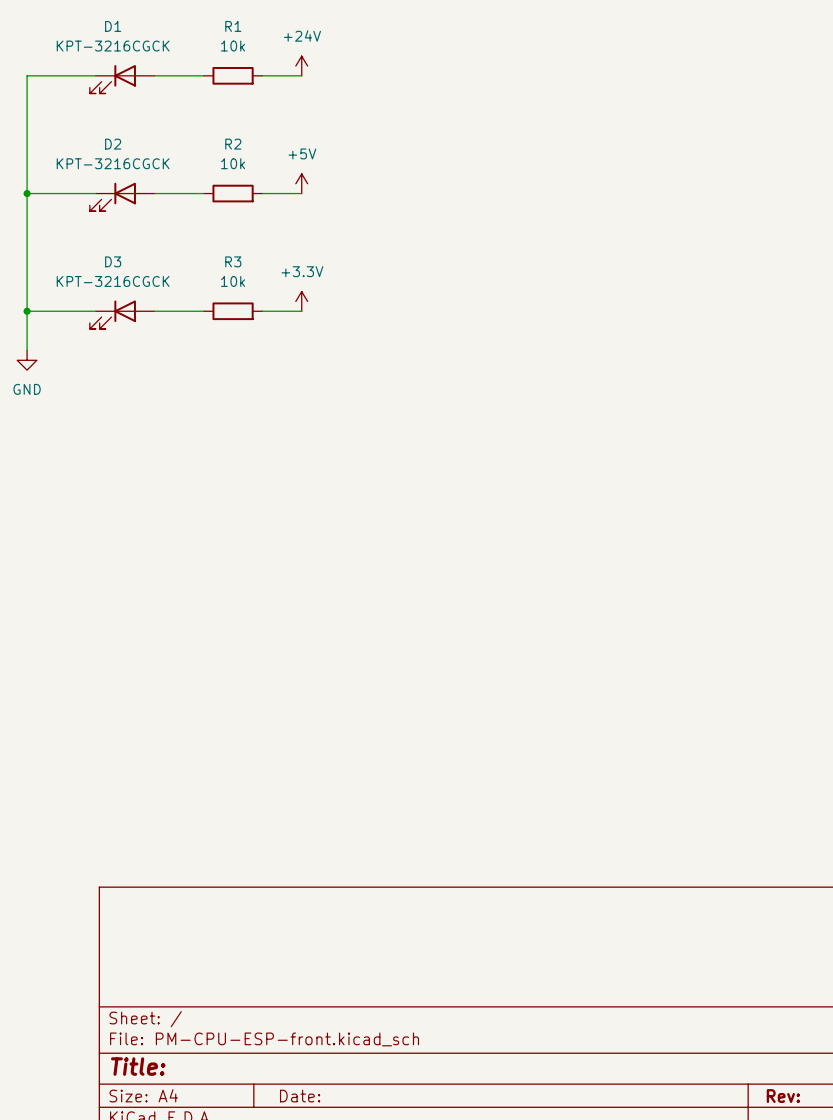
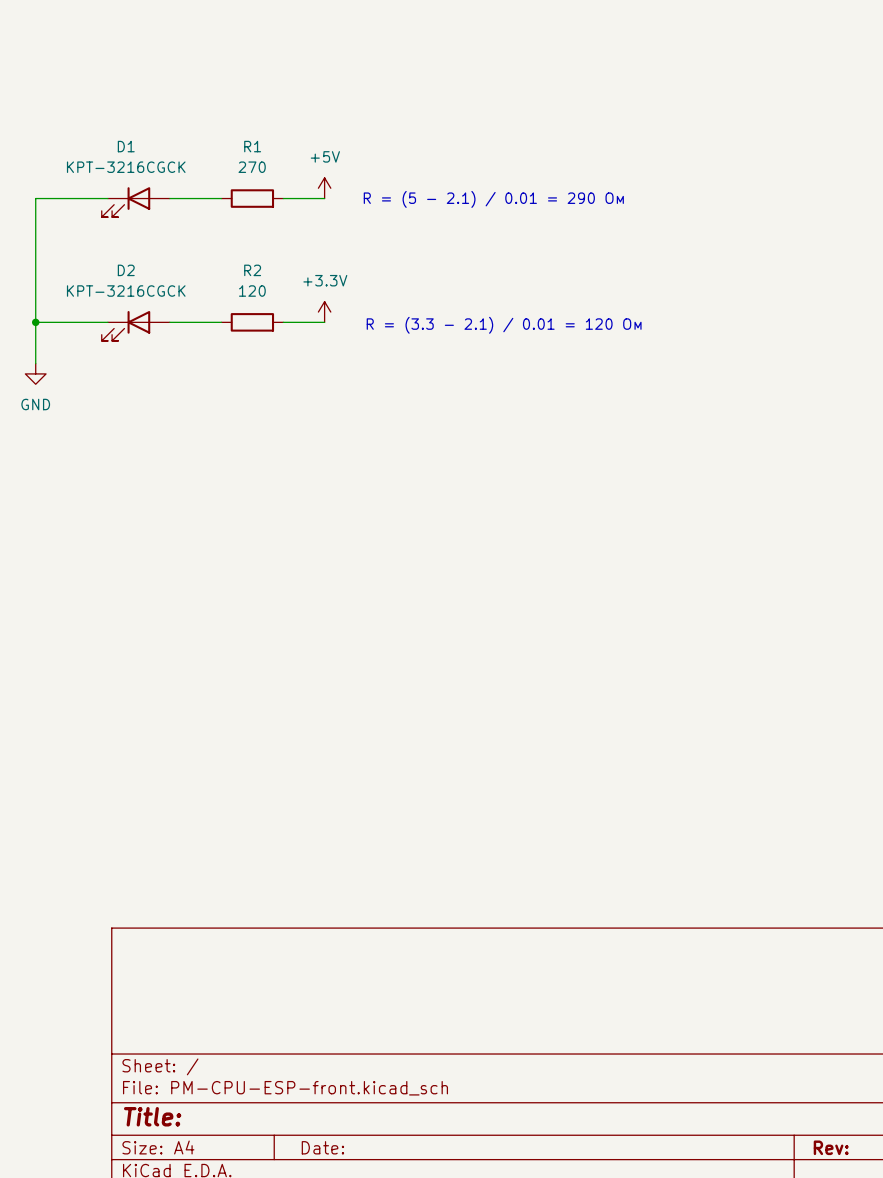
power symbol: +24V (301, 66) -> none
wire: (95, 75) (27, 75) (27, 193) -> none
wire: (154, 75) (203, 75) -> none
R1: 10k (233, 75) -> none
wire: (262, 75) (301, 75) -> none
D1: KPT-3216CGCK (122, 79) -> none
D2 name: D2 (113, 144) -> D1 (126, 146)
R2 name: R2 (233, 144) -> R1 (252, 146)
R2 value: 10k (233, 163) -> 270 (252, 167)
junction: (27, 193) -> none
text: none -> R = (5 - 2.1) / 0.01 = 290 Ом (493, 199)
D3 name: D3 (113, 261) -> D2 (126, 270)
R3 name: R3 (233, 261) -> R2 (252, 270)
R3 value: 10k (233, 281) -> 120 (252, 291)
text: none -> R = (3.3 - 2.1) / 0.01 = 120 Ом (504, 325)

